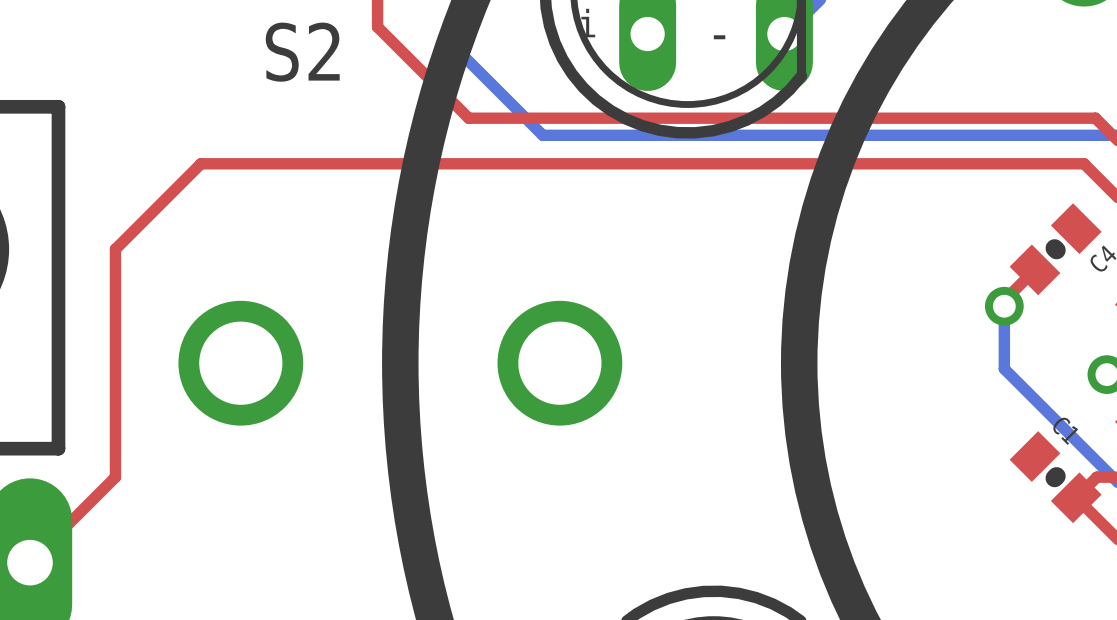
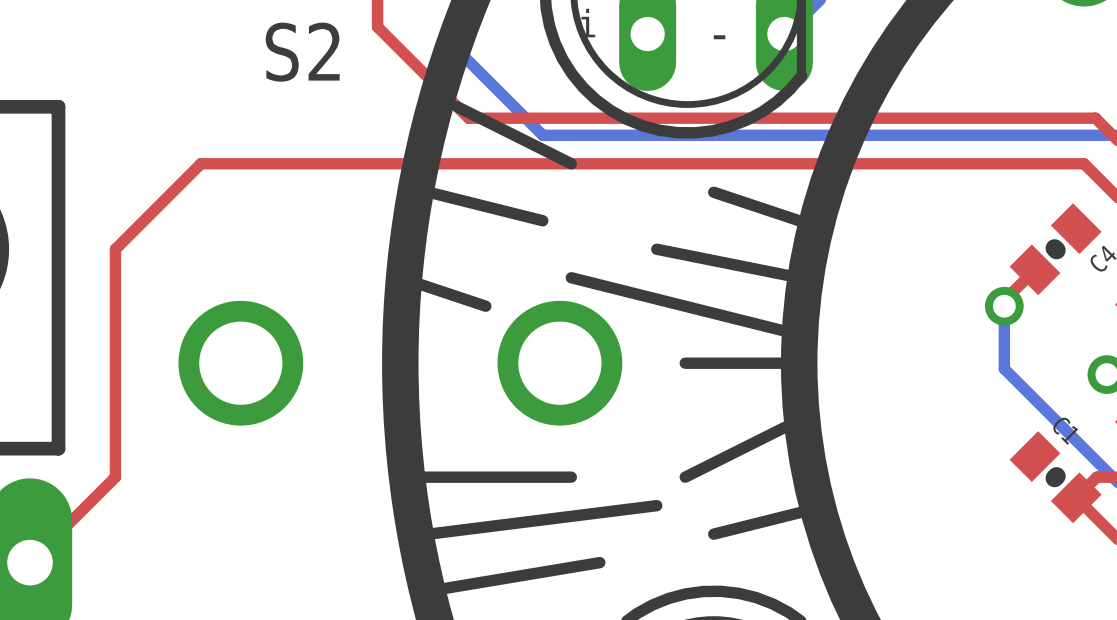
line: none -> (457, 106) (571, 163)
line: none -> (428, 192) (542, 220)
line: none -> (713, 192) (799, 220)
line: none -> (656, 249) (799, 277)
line: none -> (400, 277) (485, 306)
line: none -> (571, 277) (799, 334)
line: none -> (685, 363) (799, 363)
line: none -> (799, 420) (685, 477)
line: none -> (400, 477) (571, 477)
line: none -> (656, 505) (428, 534)
line: none -> (827, 505) (713, 534)
line: none -> (599, 562) (428, 591)

